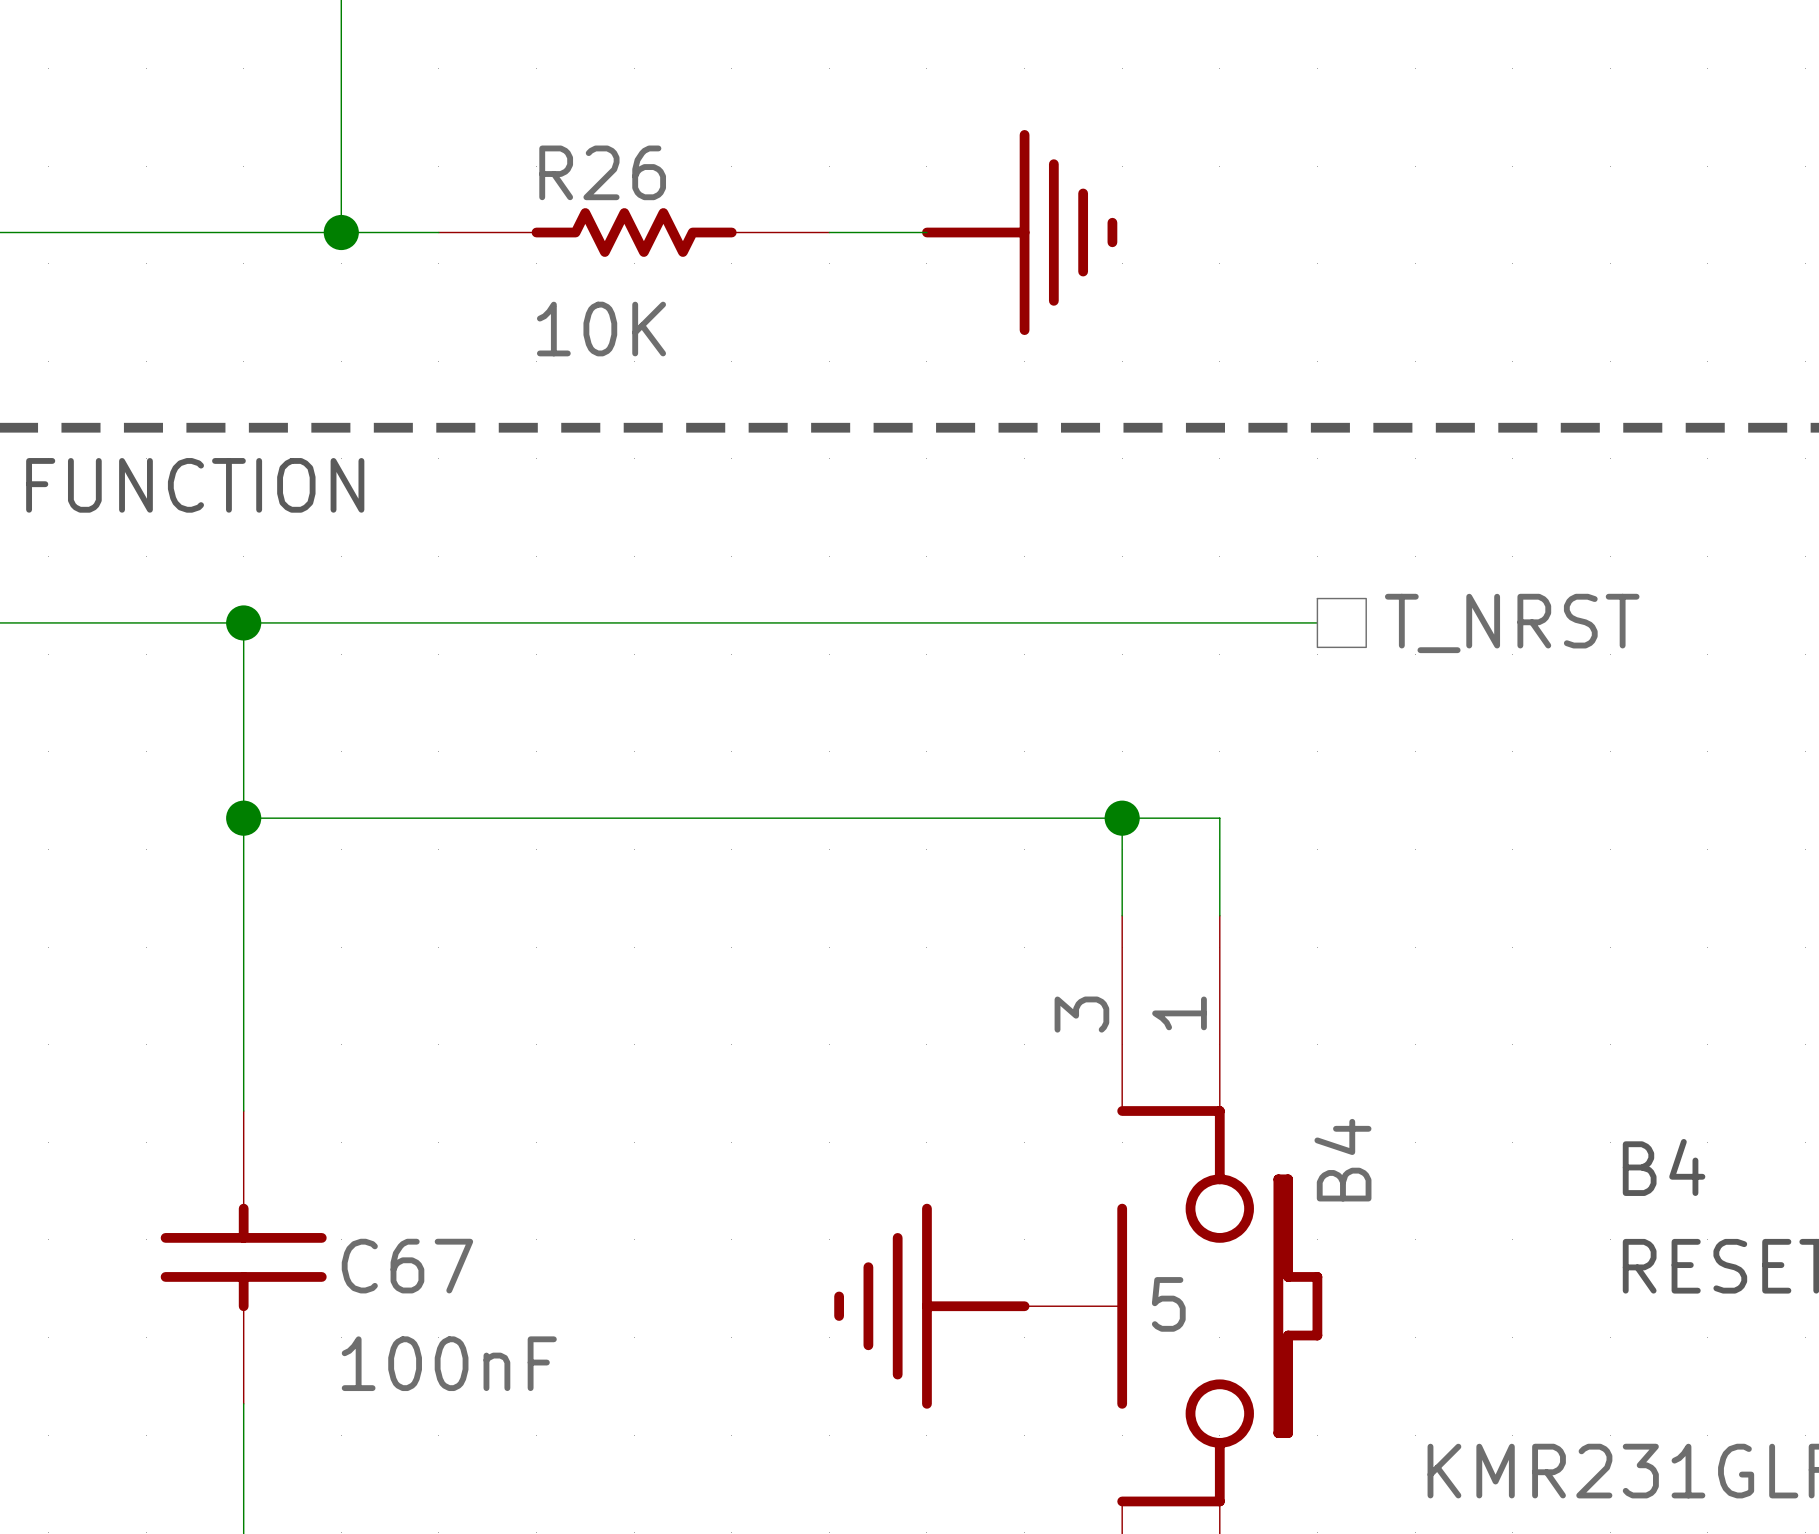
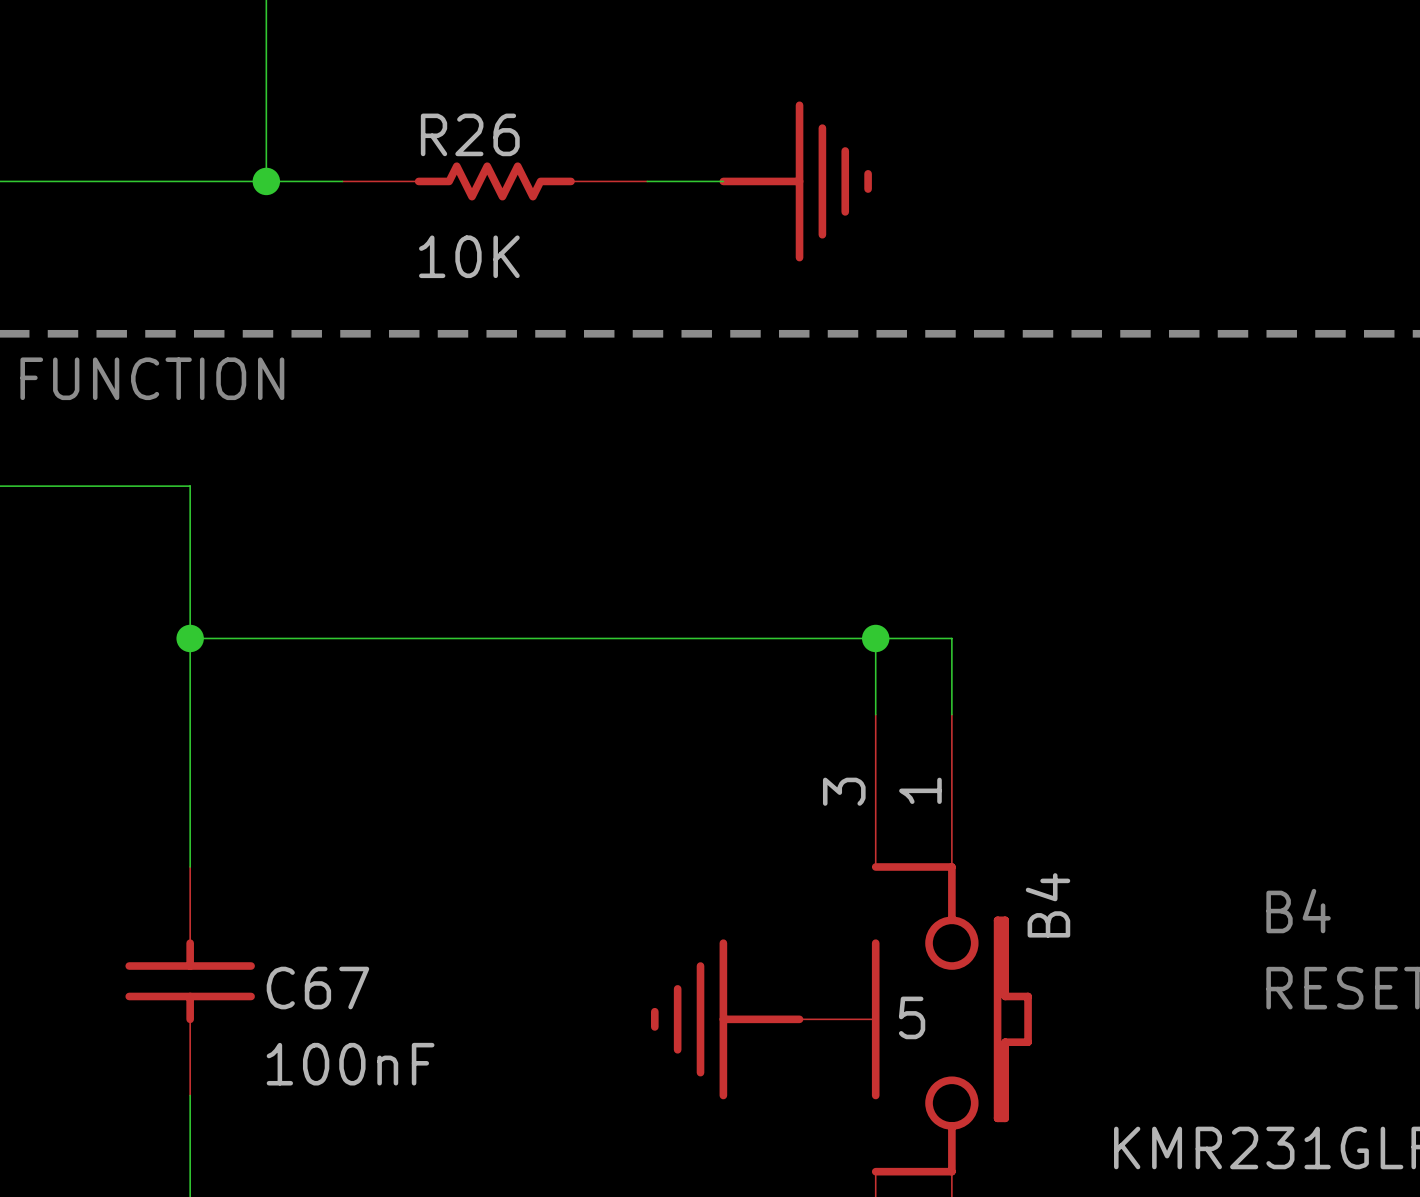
wire: (243, 622) (1317, 622) -> none
junction: (243, 622) -> none
hierarchical label: T_NRST (1512, 623) -> none

